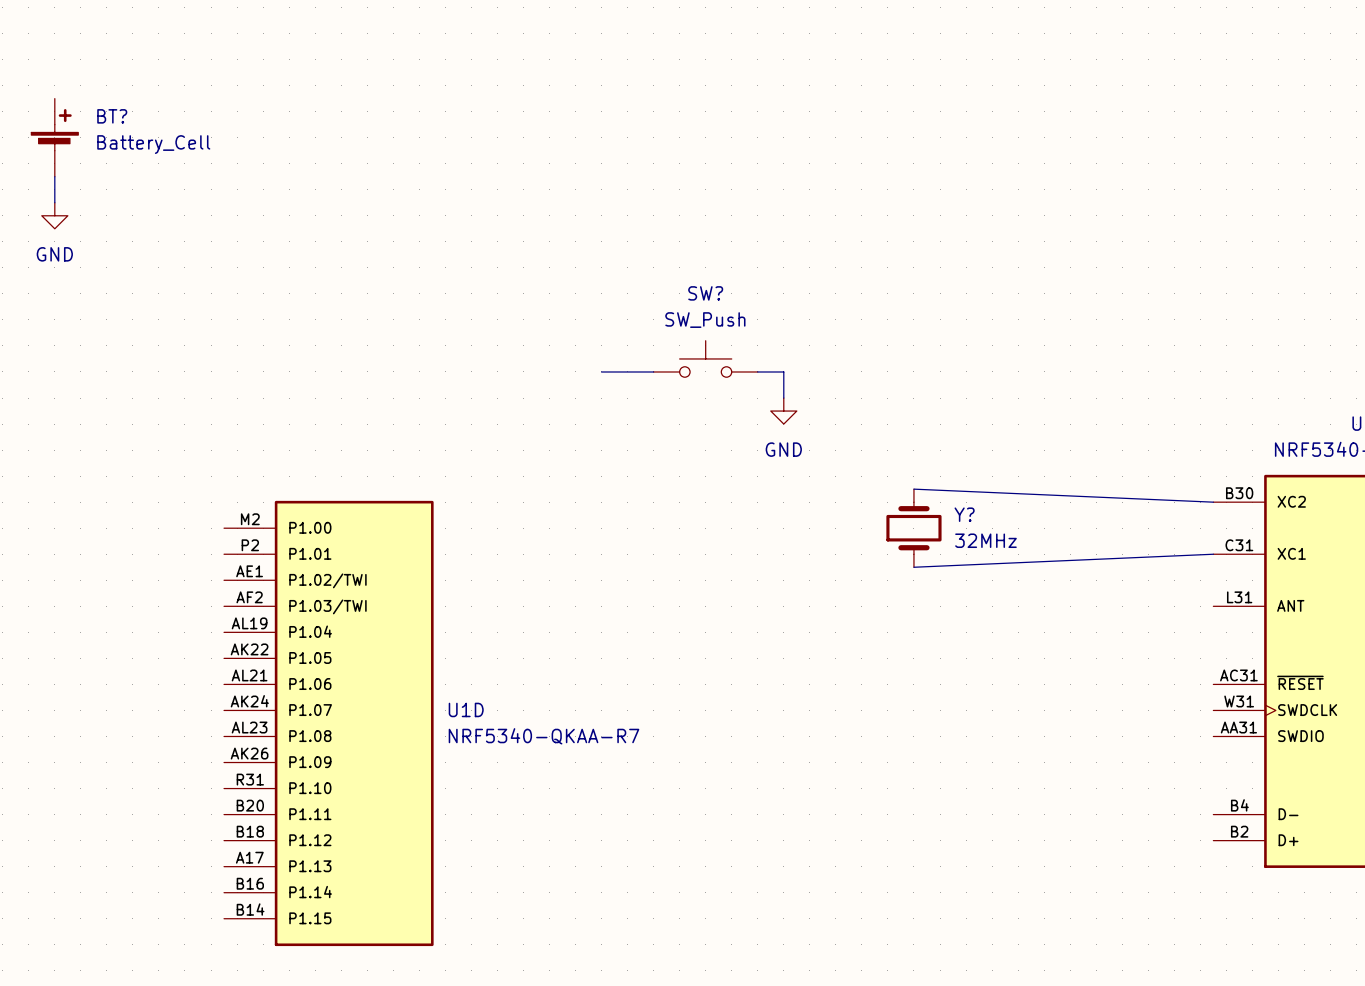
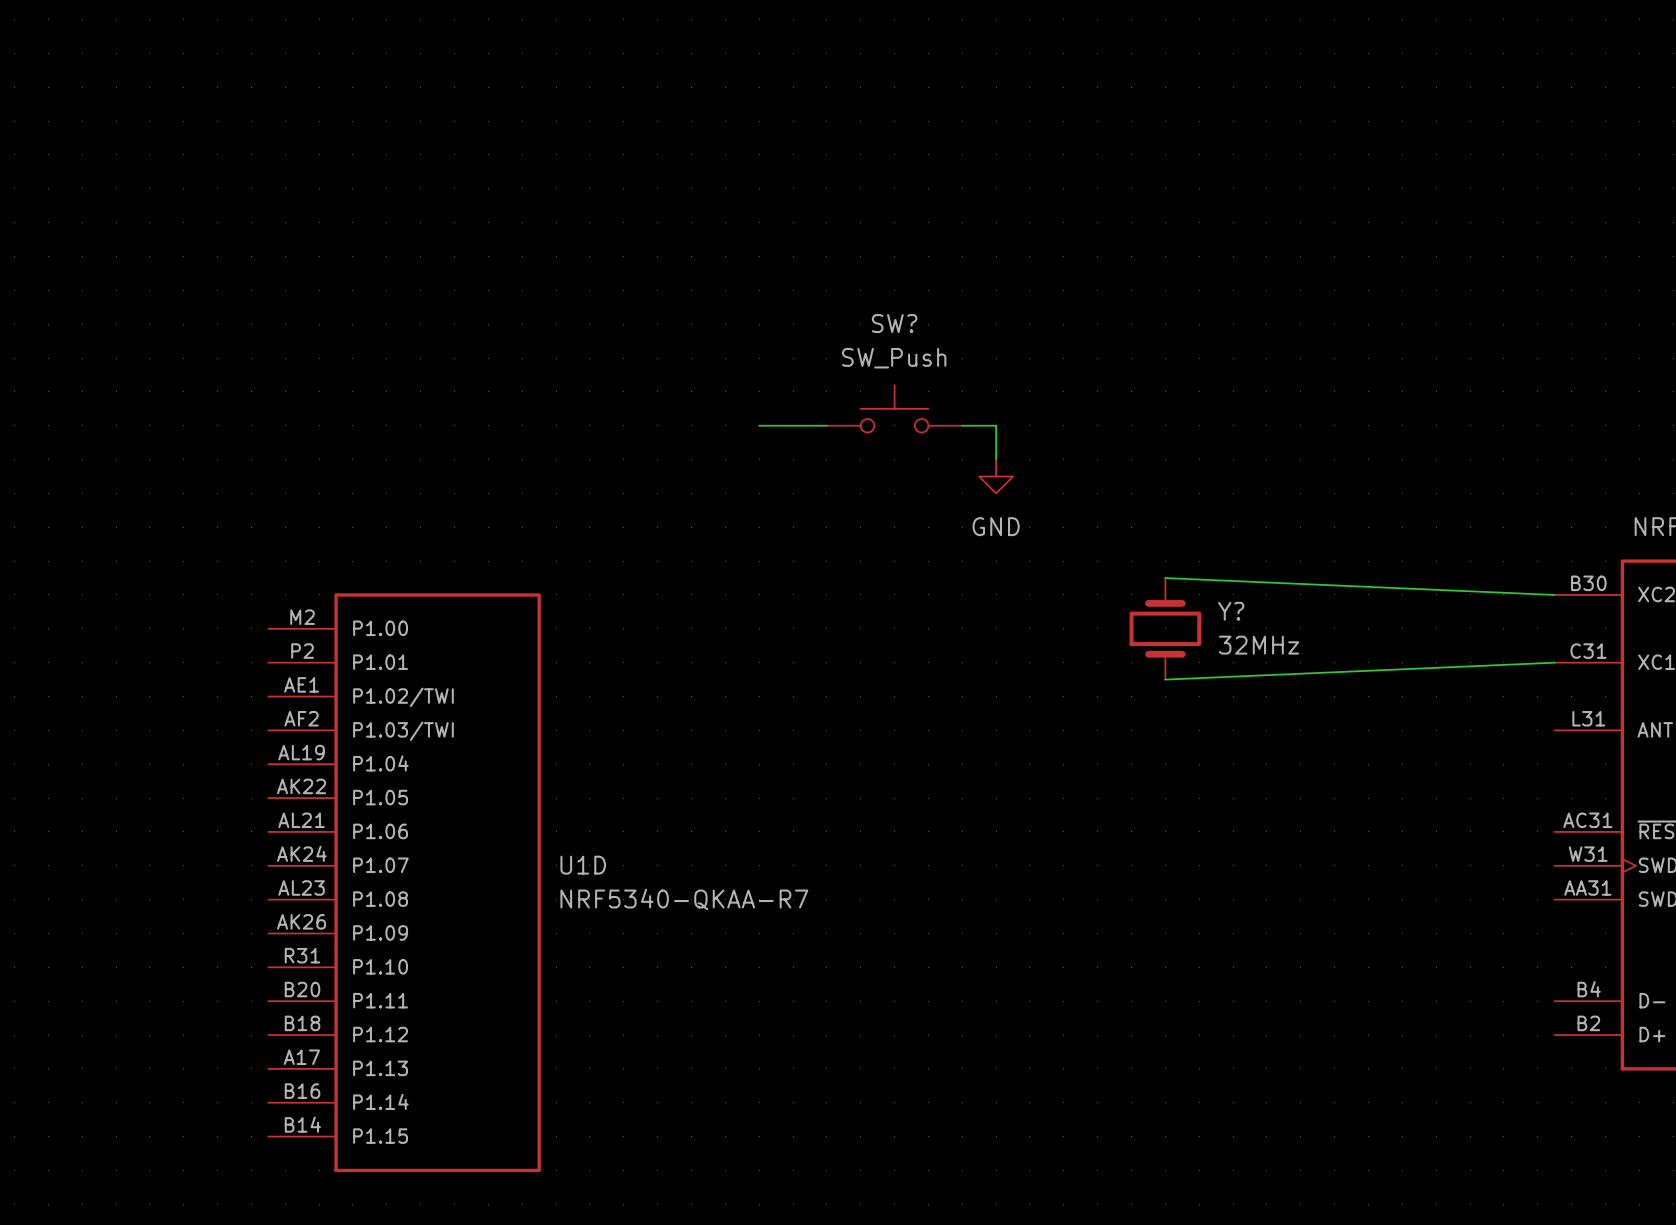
BT?: Battery_Cell (54, 137) -> none
wire: (54, 176) (54, 202) -> none
power symbol: GND (54, 215) -> none

